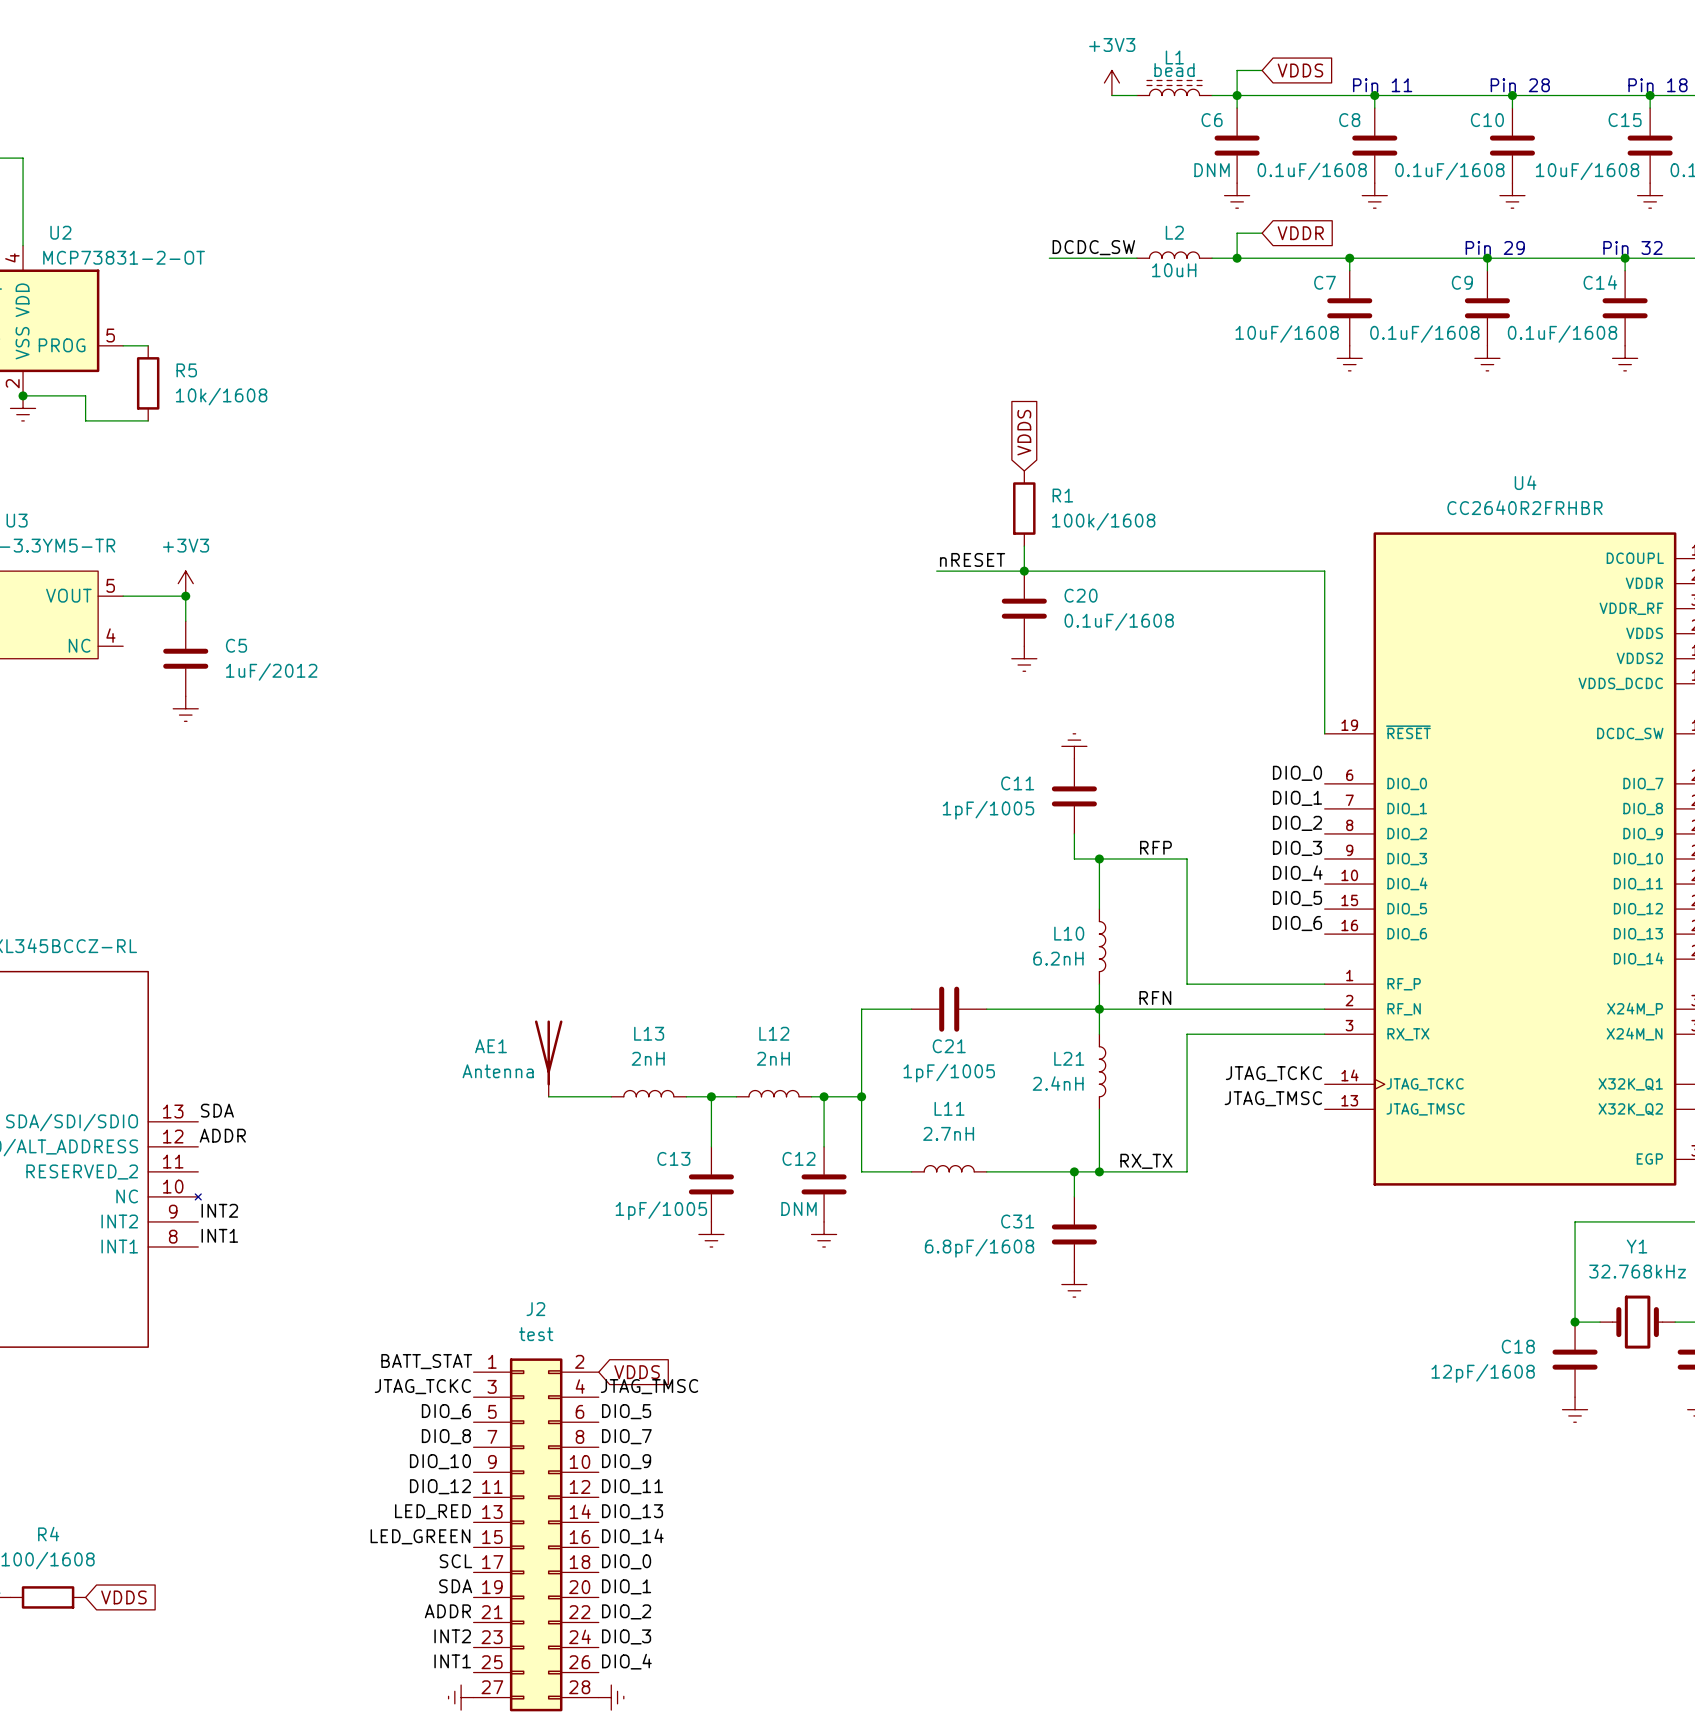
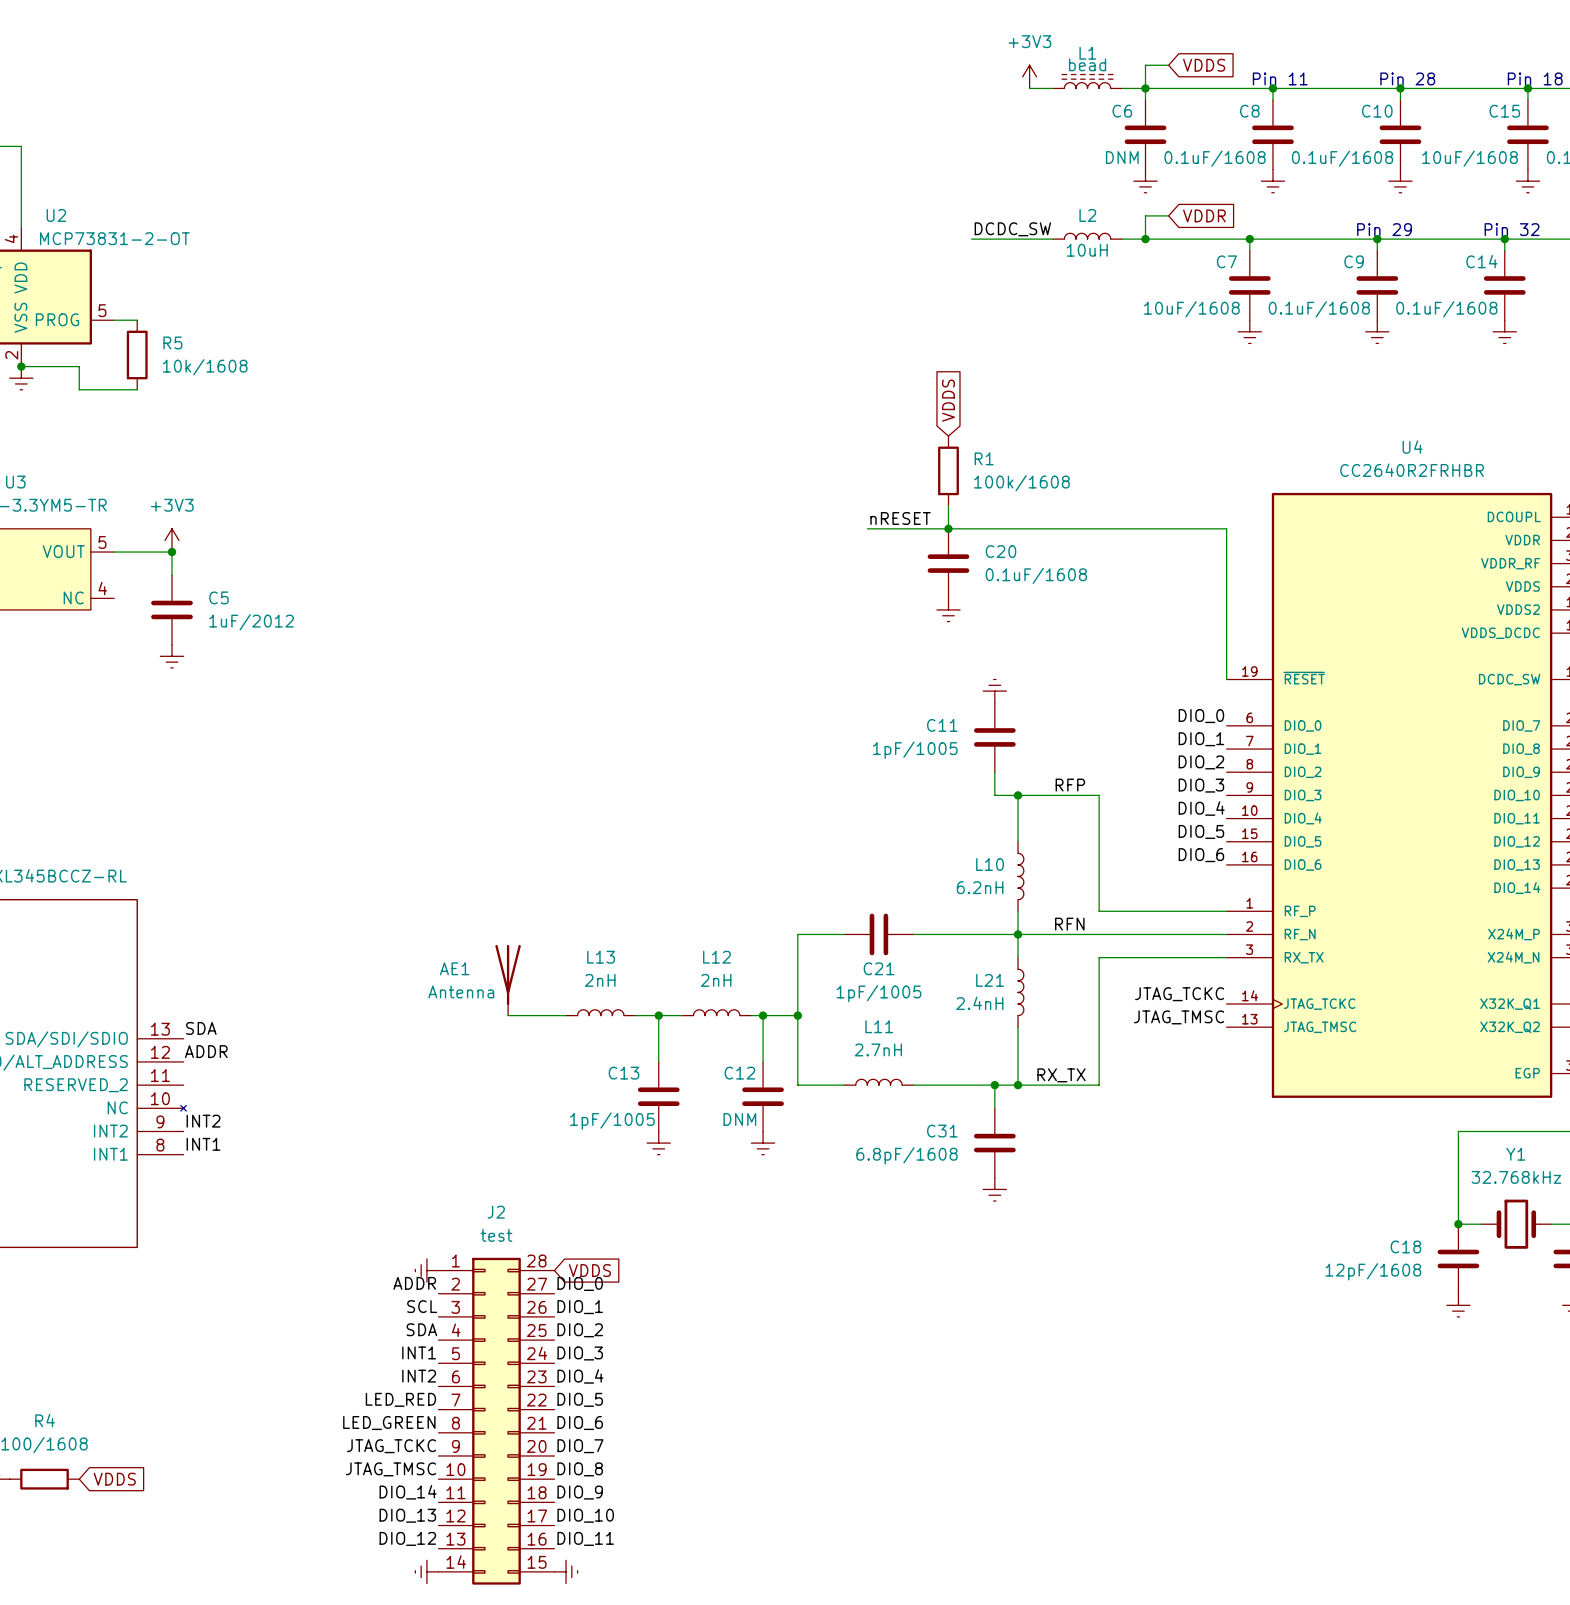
J2 symbol: [473, 1358, 599, 1712] -> [438, 1257, 555, 1585]
label: BATT_STAT (426, 1361) -> none
power symbol: none -> (426, 1270)
label: JTAG_TCKC (422, 1386) -> ADDR (414, 1283)
label: JTAG_TMSC (649, 1386) -> DIO_0 (580, 1283)
label: DIO_6 (446, 1411) -> SCL (422, 1306)
label: DIO_5 (626, 1411) -> DIO_1 (580, 1307)
label: DIO_8 (446, 1436) -> SDA (421, 1329)
label: DIO_7 (626, 1436) -> DIO_2 (580, 1330)
label: DIO_10 (440, 1461) -> INT1 (419, 1352)
label: DIO_9 (626, 1461) -> DIO_3 (580, 1353)
label: DIO_12 (440, 1486) -> INT2 (419, 1376)
label: DIO_11 (632, 1486) -> DIO_4 (580, 1376)
label: DIO_13 (632, 1511) -> DIO_5 (580, 1399)
label: DIO_14 (632, 1536) -> DIO_6 (580, 1423)
label: SCL (455, 1561) -> JTAG_TCKC (391, 1446)
label: DIO_0 (626, 1561) -> DIO_7 (580, 1446)
label: SDA (455, 1586) -> JTAG_TMSC (390, 1469)
label: DIO_1 (626, 1586) -> DIO_8 (580, 1469)
label: ADDR (447, 1611) -> DIO_14 (408, 1492)
label: DIO_2 (626, 1611) -> DIO_9 (580, 1492)
label: INT2 (452, 1636) -> DIO_13 (407, 1515)
label: DIO_3 (626, 1636) -> DIO_10 (585, 1515)
label: INT1 (452, 1661) -> DIO_12 (407, 1538)
label: DIO_4 (626, 1661) -> DIO_11 (585, 1538)

